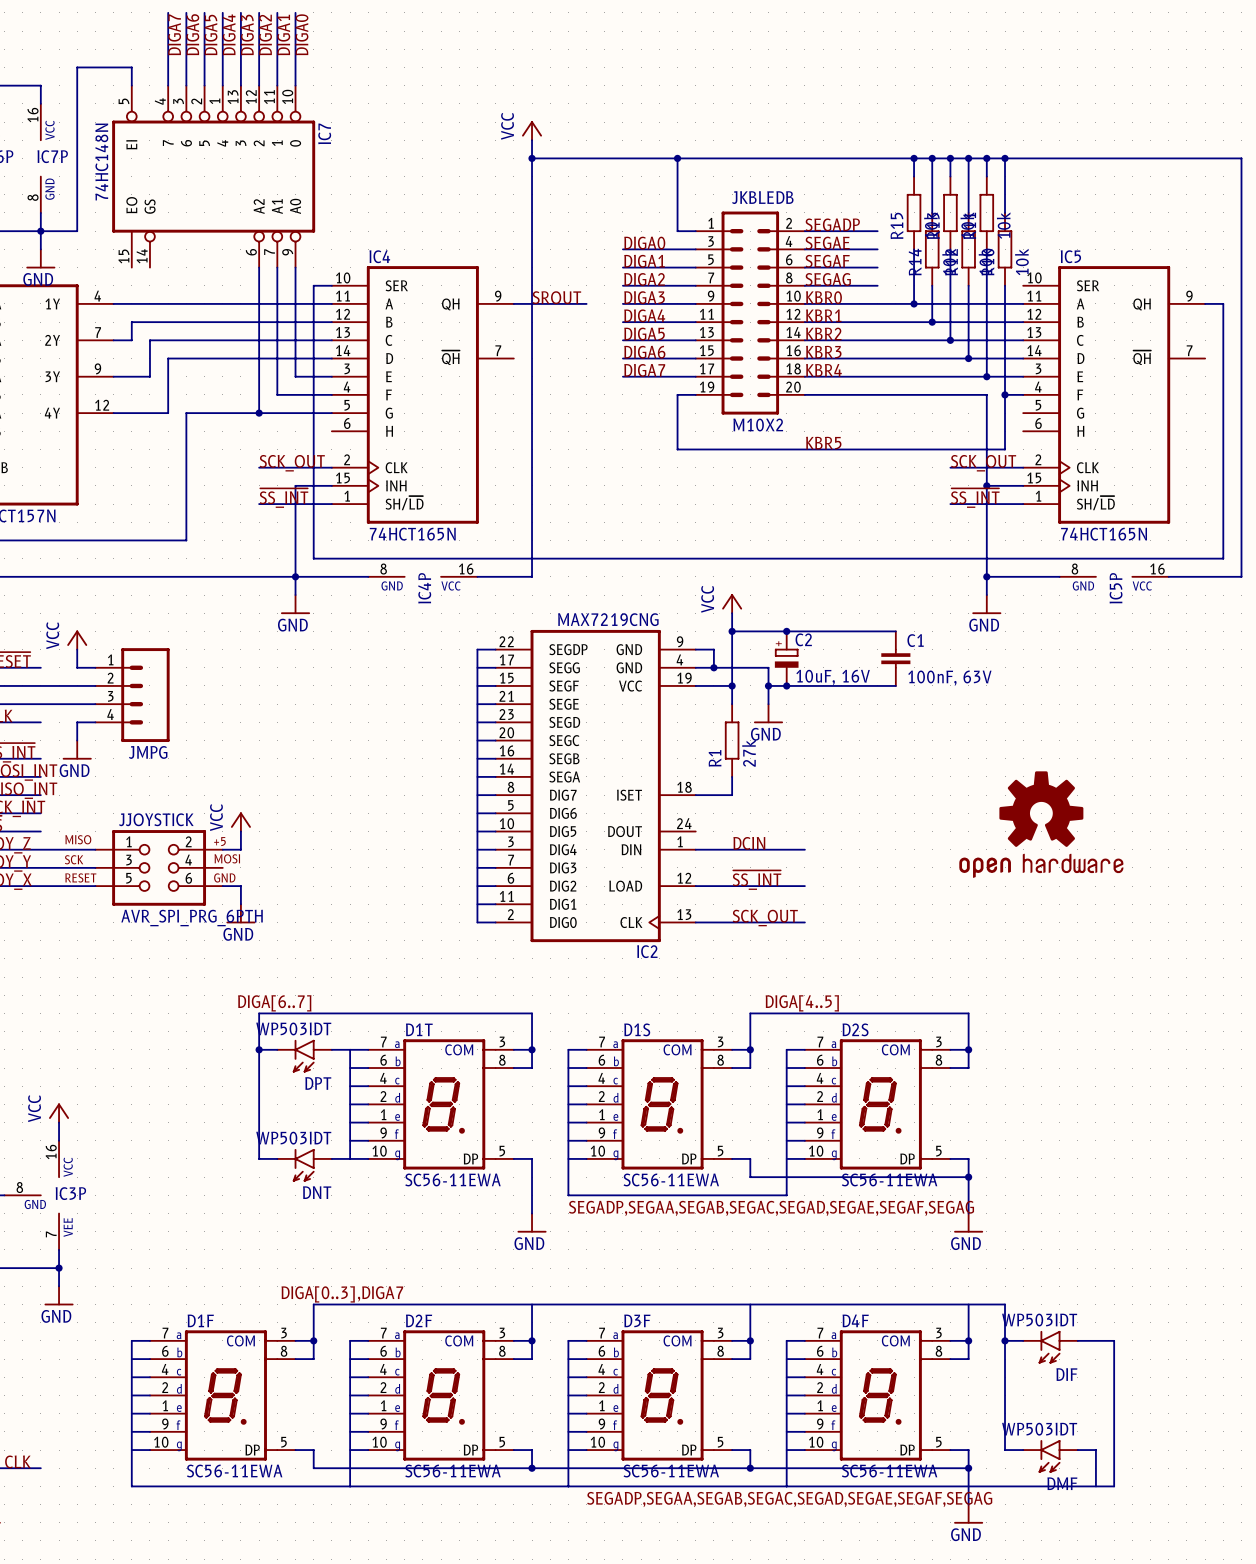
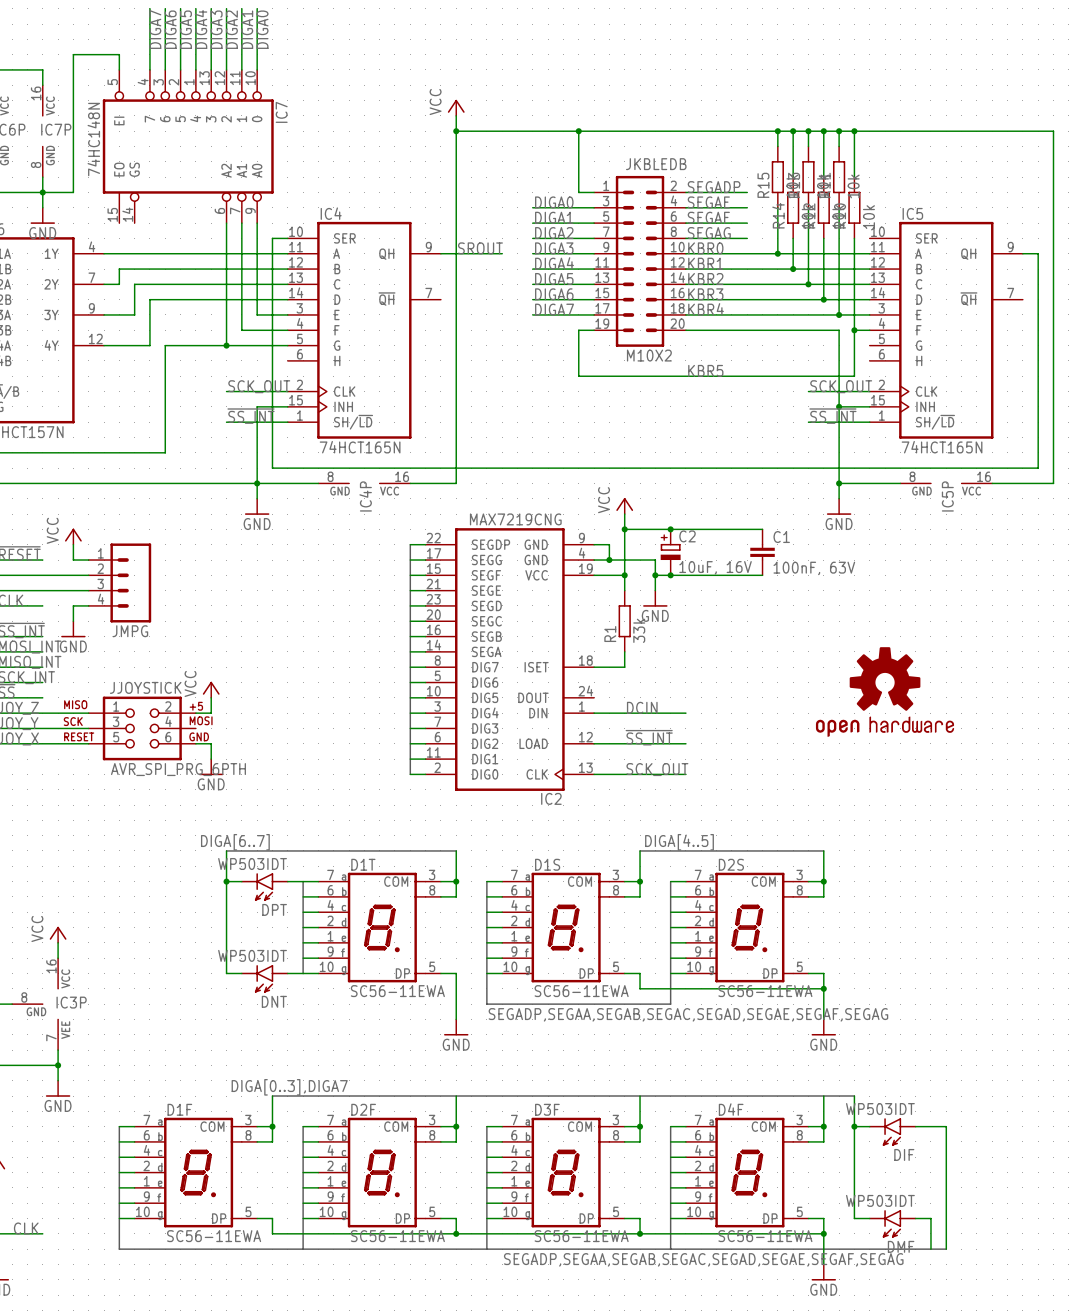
R1 value: 27k (748, 753) -> 33k (639, 630)

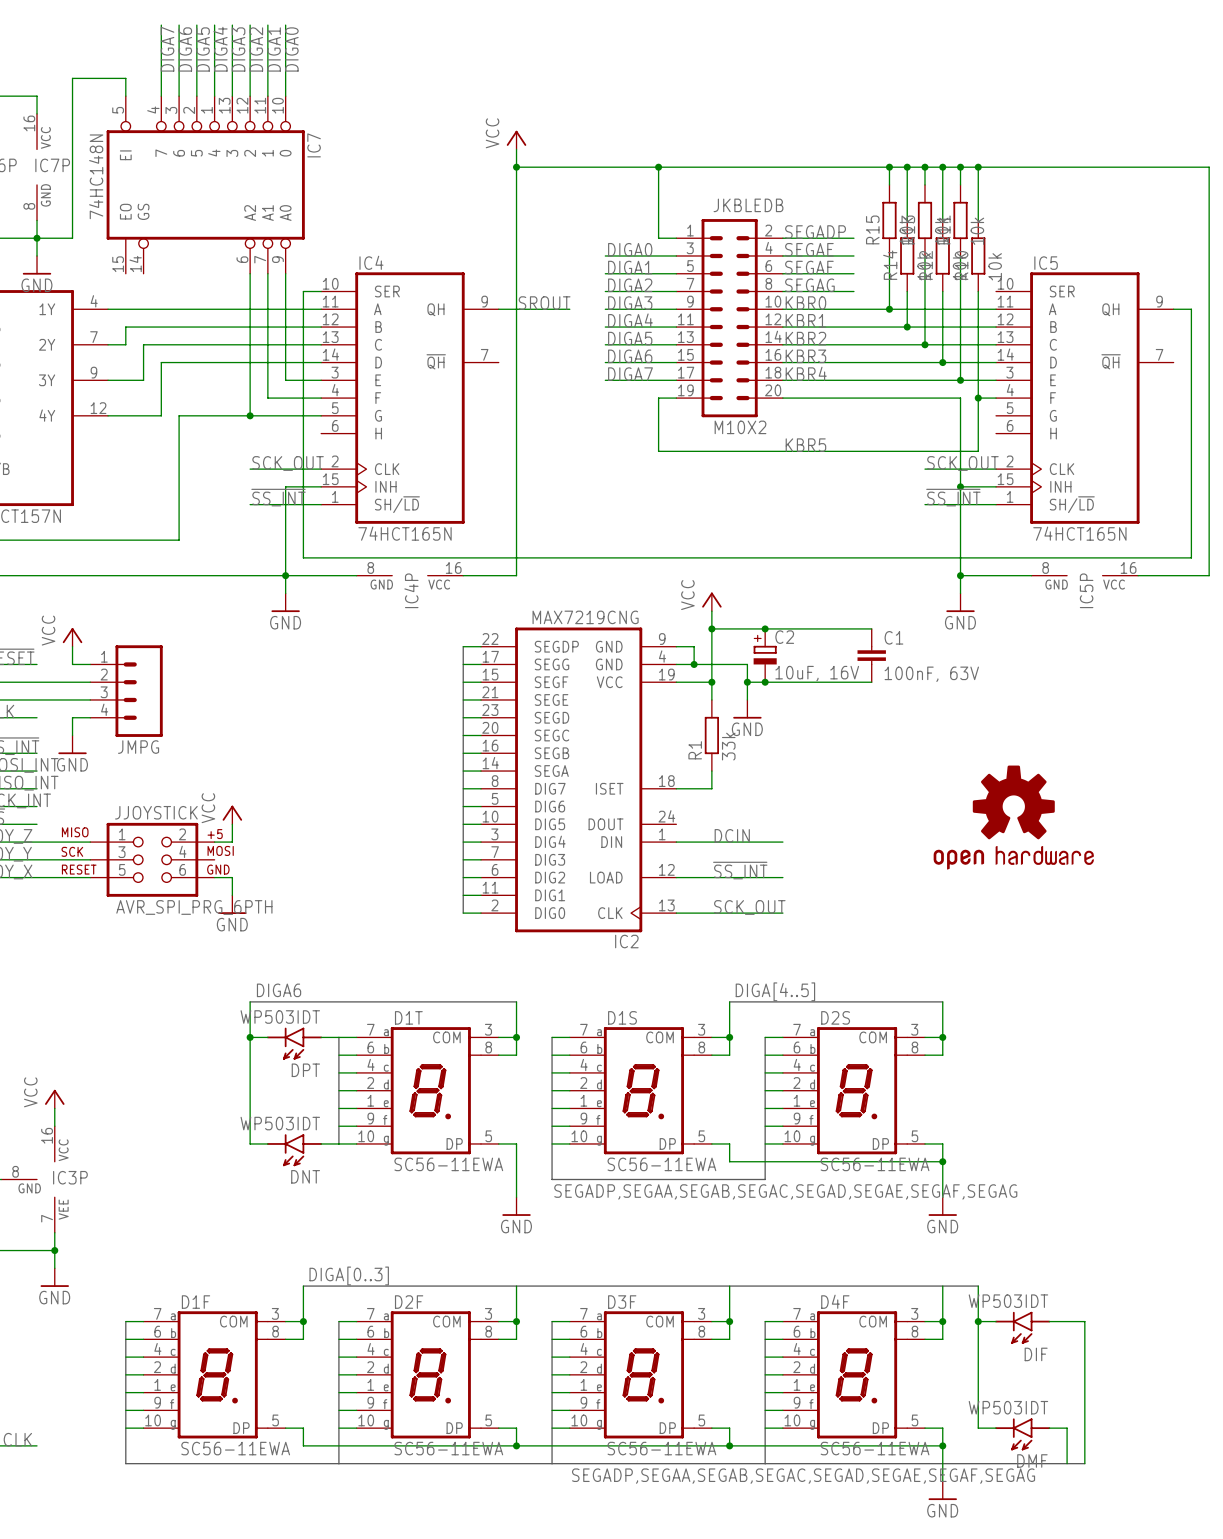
label: DIGA[6..7] (235, 842) -> DIGA6 (279, 990)
label: DIGA[0..3],DIGA7 (289, 1087) -> DIGA[0..3] (349, 1275)

